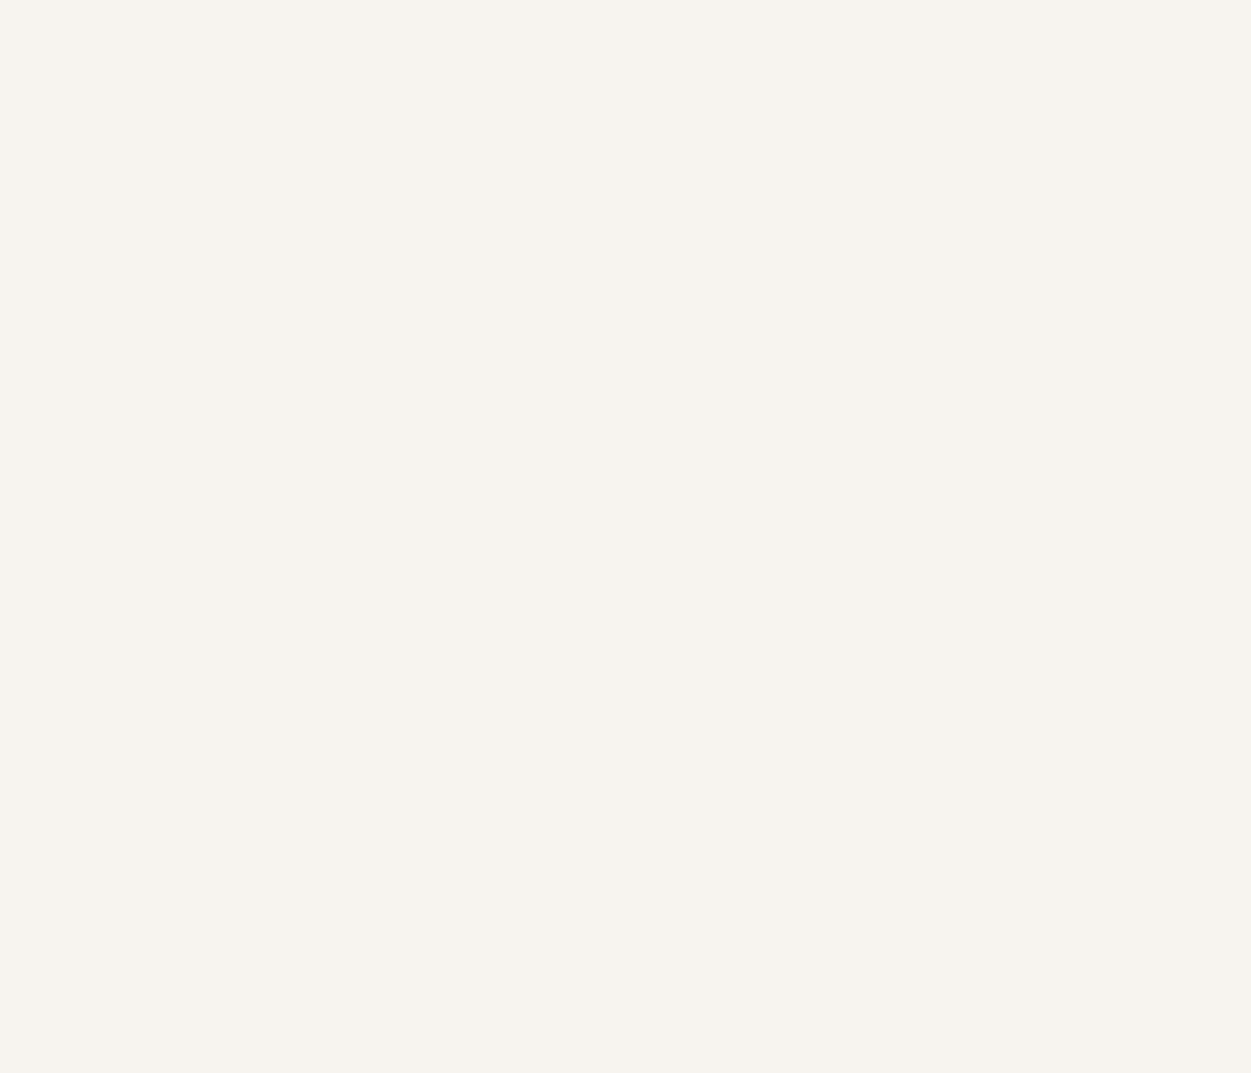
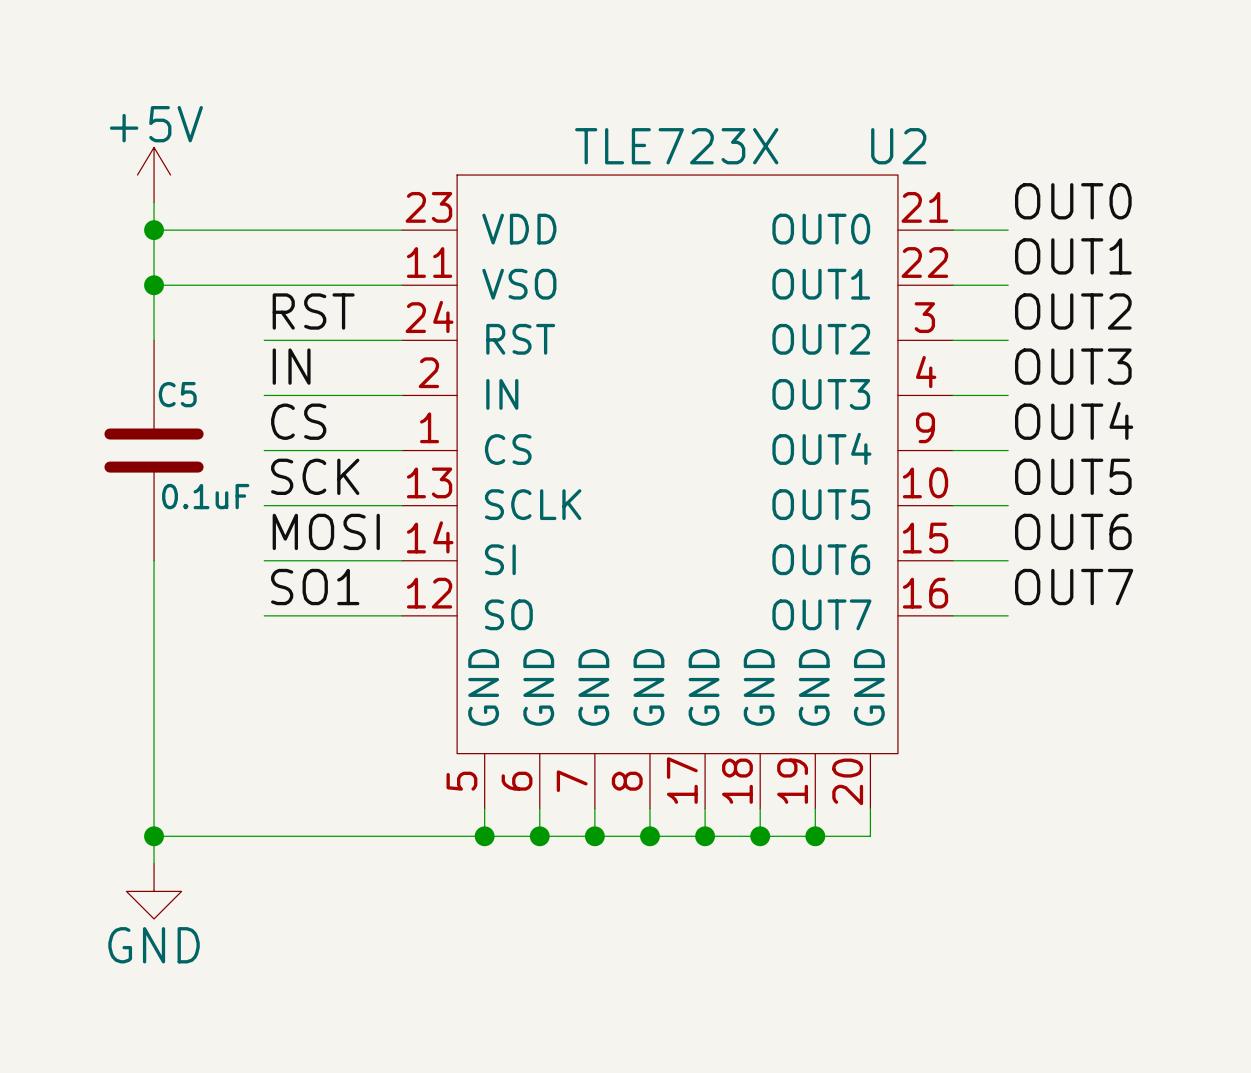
power symbol: none -> +5V (154, 175)
label: none -> OUT0 (1073, 201)
wire: none -> (154, 202) (154, 340)
wire: none -> (154, 230) (402, 230)
junction: none -> (154, 230)
wire: none -> (953, 230) (1008, 230)
label: none -> OUT1 (1073, 256)
wire: none -> (154, 285) (402, 285)
junction: none -> (154, 285)
wire: none -> (953, 285) (1008, 285)
label: none -> RST (313, 311)
label: none -> OUT2 (1073, 311)
wire: none -> (264, 340) (402, 340)
wire: none -> (953, 340) (1008, 340)
label: none -> IN (291, 366)
label: none -> OUT3 (1073, 366)
wire: none -> (264, 395) (402, 395)
wire: none -> (953, 395) (1008, 395)
label: none -> OUT4 (1074, 420)
label: none -> CS (298, 421)
C5: none -> 0.1uF (154, 450)
wire: none -> (264, 450) (402, 450)
wire: none -> (953, 450) (1008, 450)
label: none -> SCK (315, 476)
label: none -> OUT5 (1073, 476)
U2: none -> TLE723X (677, 491)
wire: none -> (264, 505) (402, 505)
wire: none -> (953, 505) (1008, 505)
label: none -> MOSI (326, 531)
label: none -> OUT6 (1073, 531)
wire: none -> (154, 560) (154, 863)
wire: none -> (264, 560) (402, 560)
wire: none -> (953, 560) (1008, 560)
label: none -> SO1 (315, 587)
label: none -> OUT7 (1074, 587)
wire: none -> (264, 615) (402, 615)
wire: none -> (953, 615) (1008, 615)
wire: none -> (484, 808) (484, 836)
wire: none -> (539, 808) (539, 836)
wire: none -> (594, 808) (594, 836)
wire: none -> (649, 808) (649, 836)
wire: none -> (705, 808) (705, 836)
wire: none -> (760, 808) (760, 836)
wire: none -> (815, 808) (815, 836)
wire: none -> (870, 808) (870, 836) (154, 836)
junction: none -> (154, 836)
junction: none -> (484, 836)
junction: none -> (539, 836)
junction: none -> (594, 836)
junction: none -> (649, 836)
junction: none -> (705, 836)
junction: none -> (760, 836)
junction: none -> (815, 836)
power symbol: none -> GND (154, 891)

